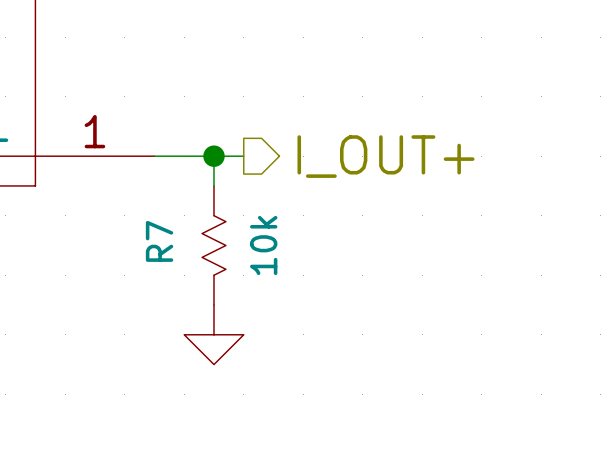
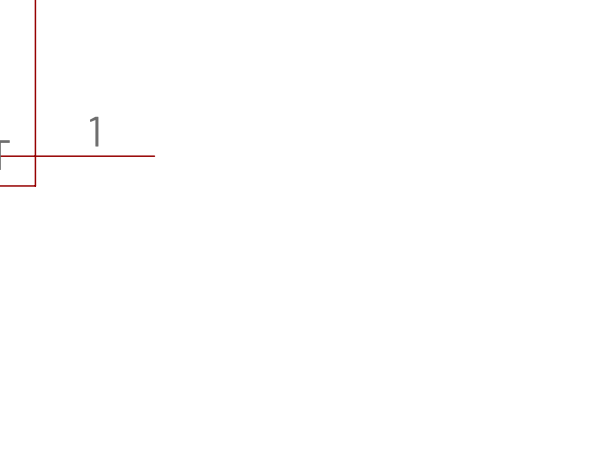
wire: (154, 156) (243, 156) -> none
wire: (213, 156) (213, 185) -> none
junction: (213, 156) -> none
hierarchical label: I_OUT+ (386, 156) -> none
R7: 10k (213, 245) -> none
power symbol: (213, 334) -> none

